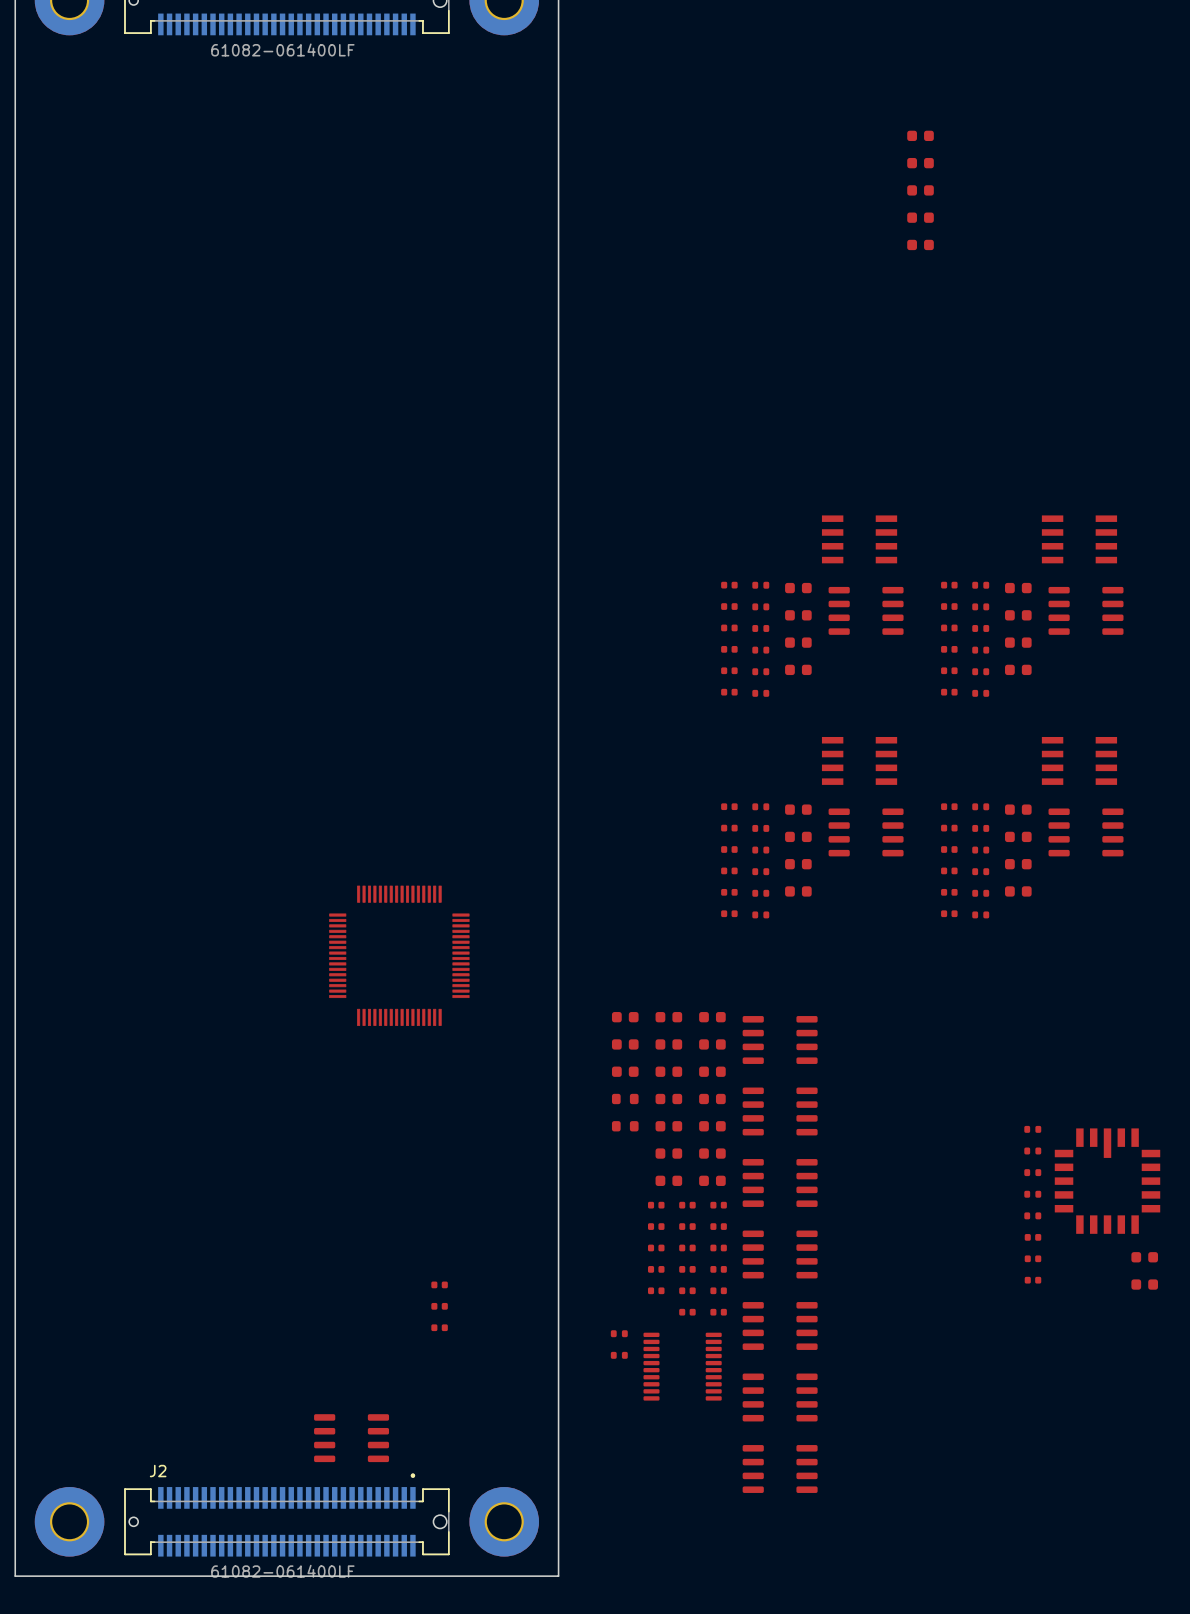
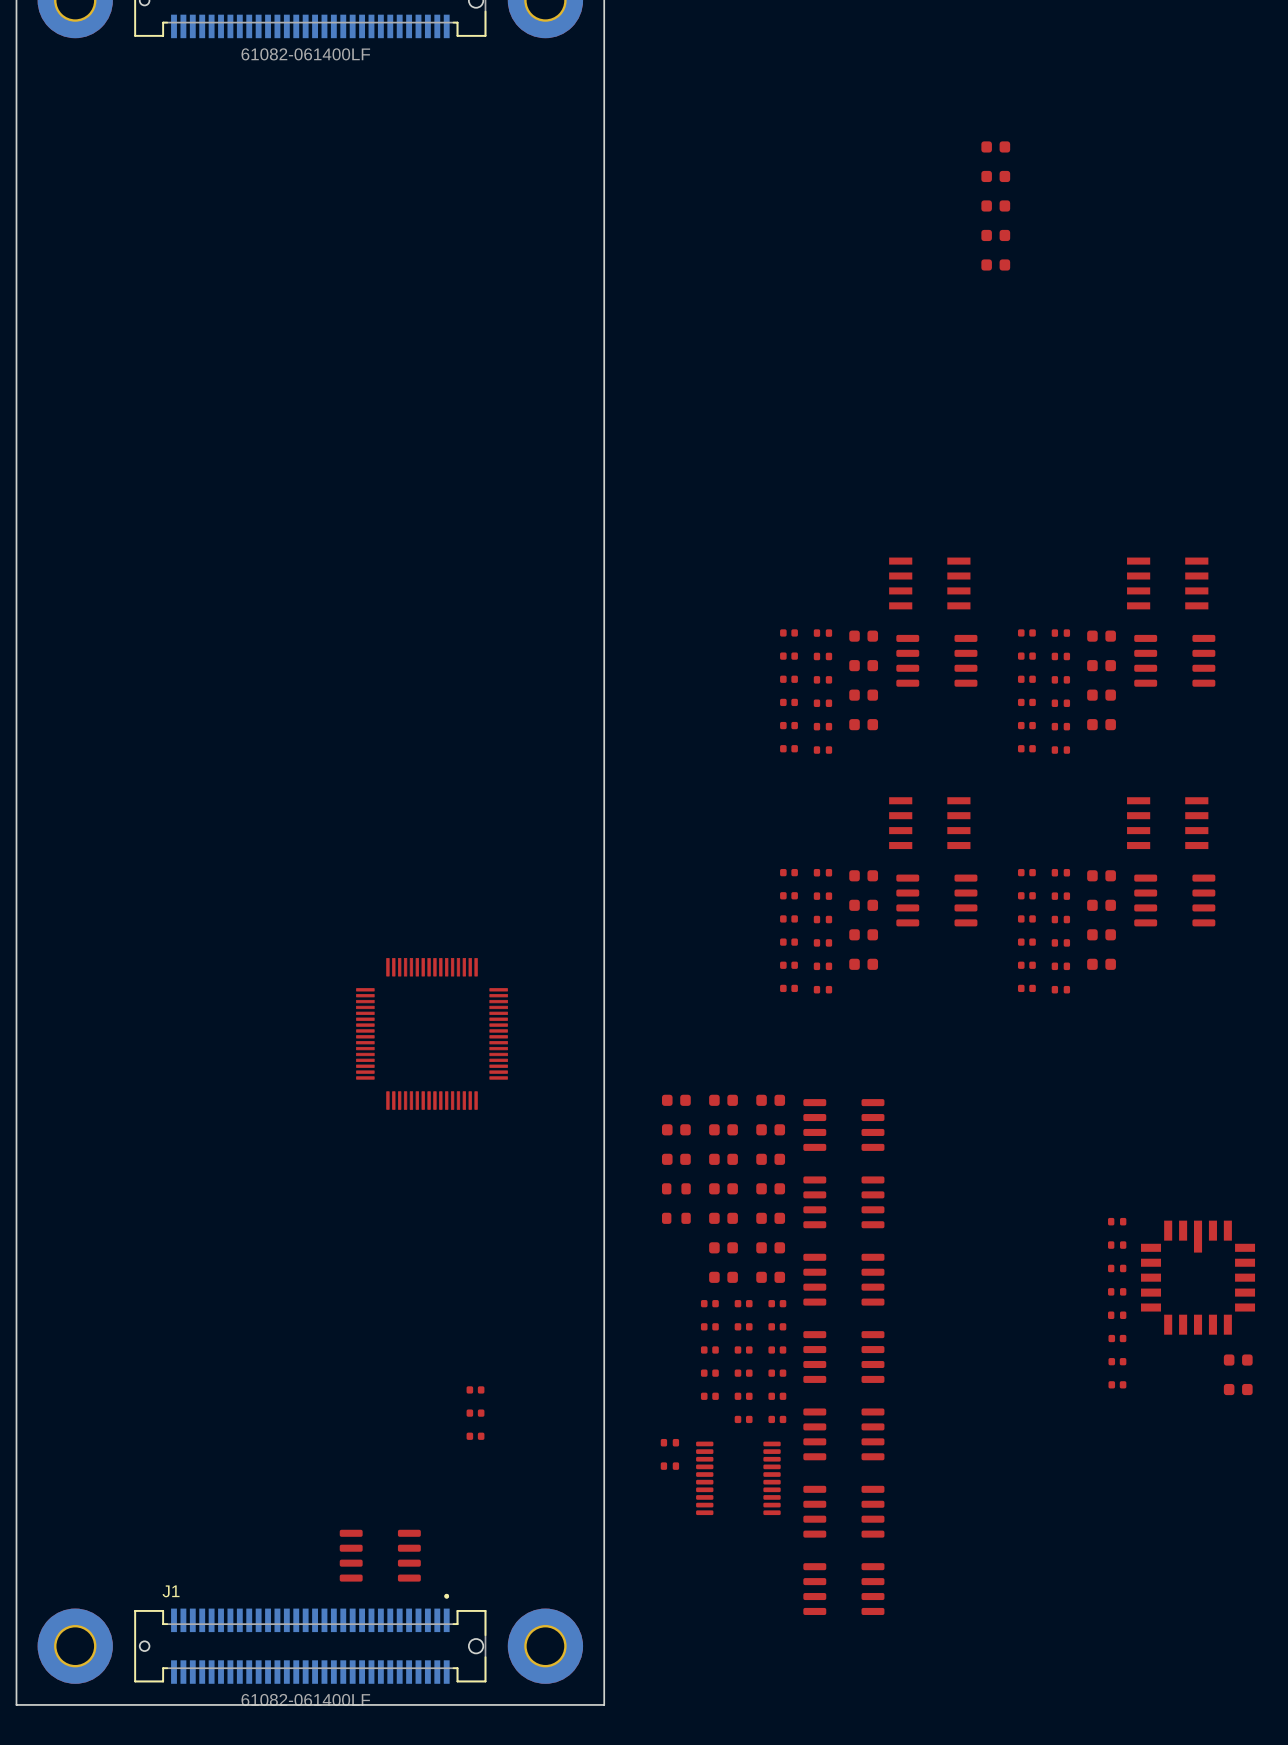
J2 name: J2 (158, 1471) -> J1 (171, 1591)

